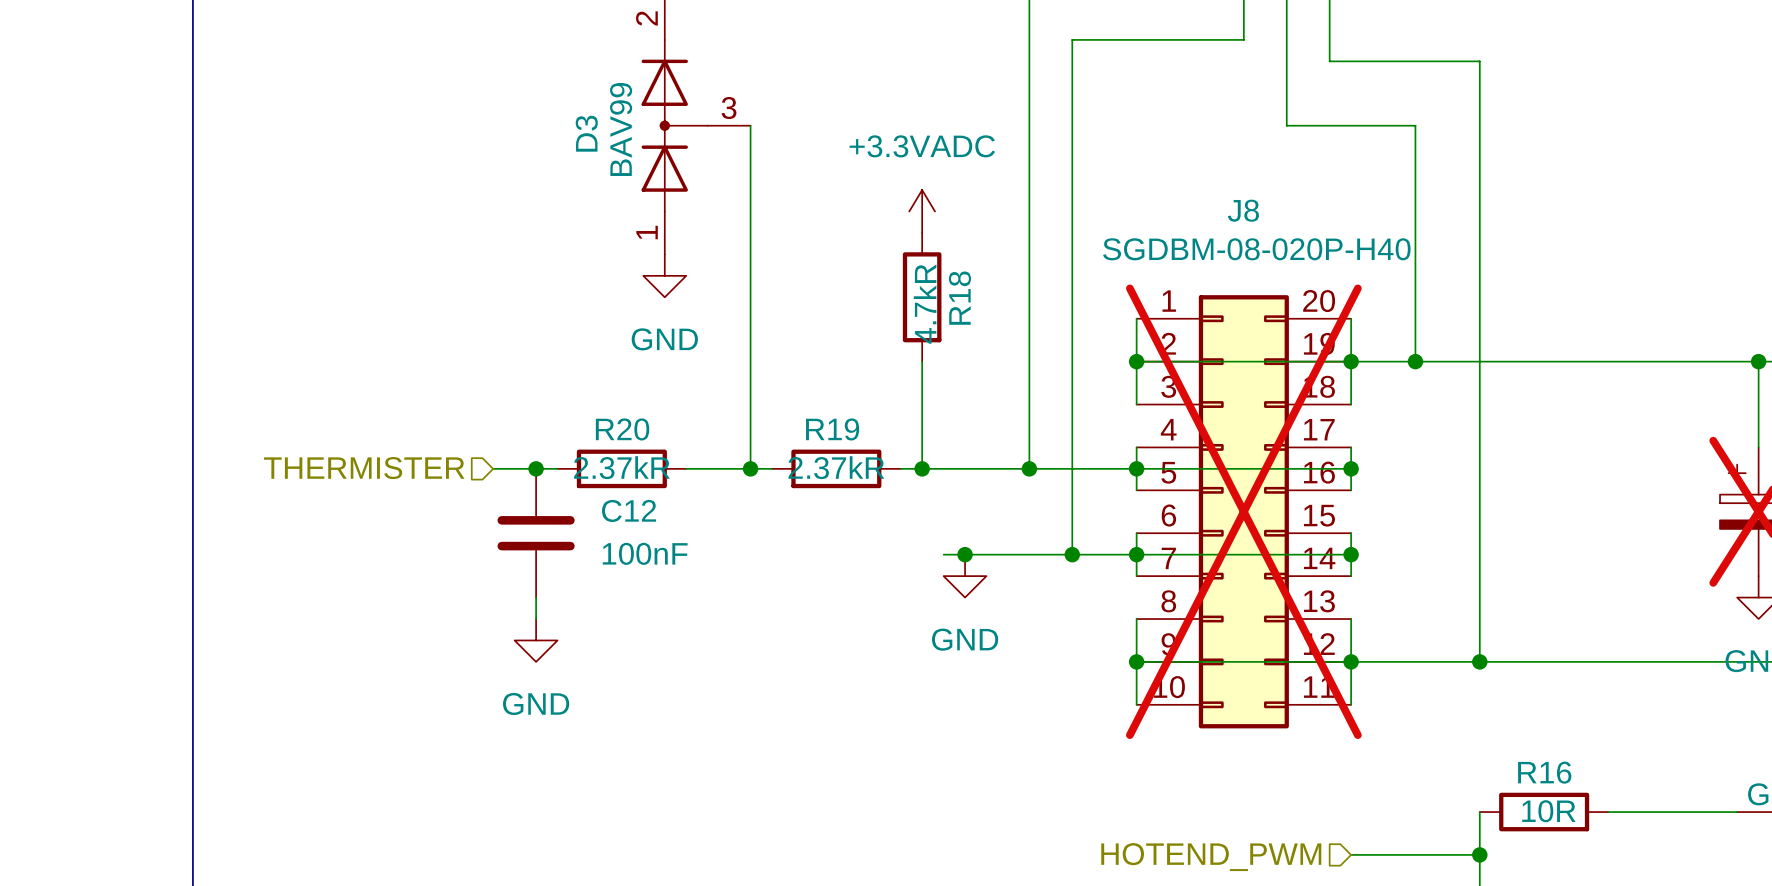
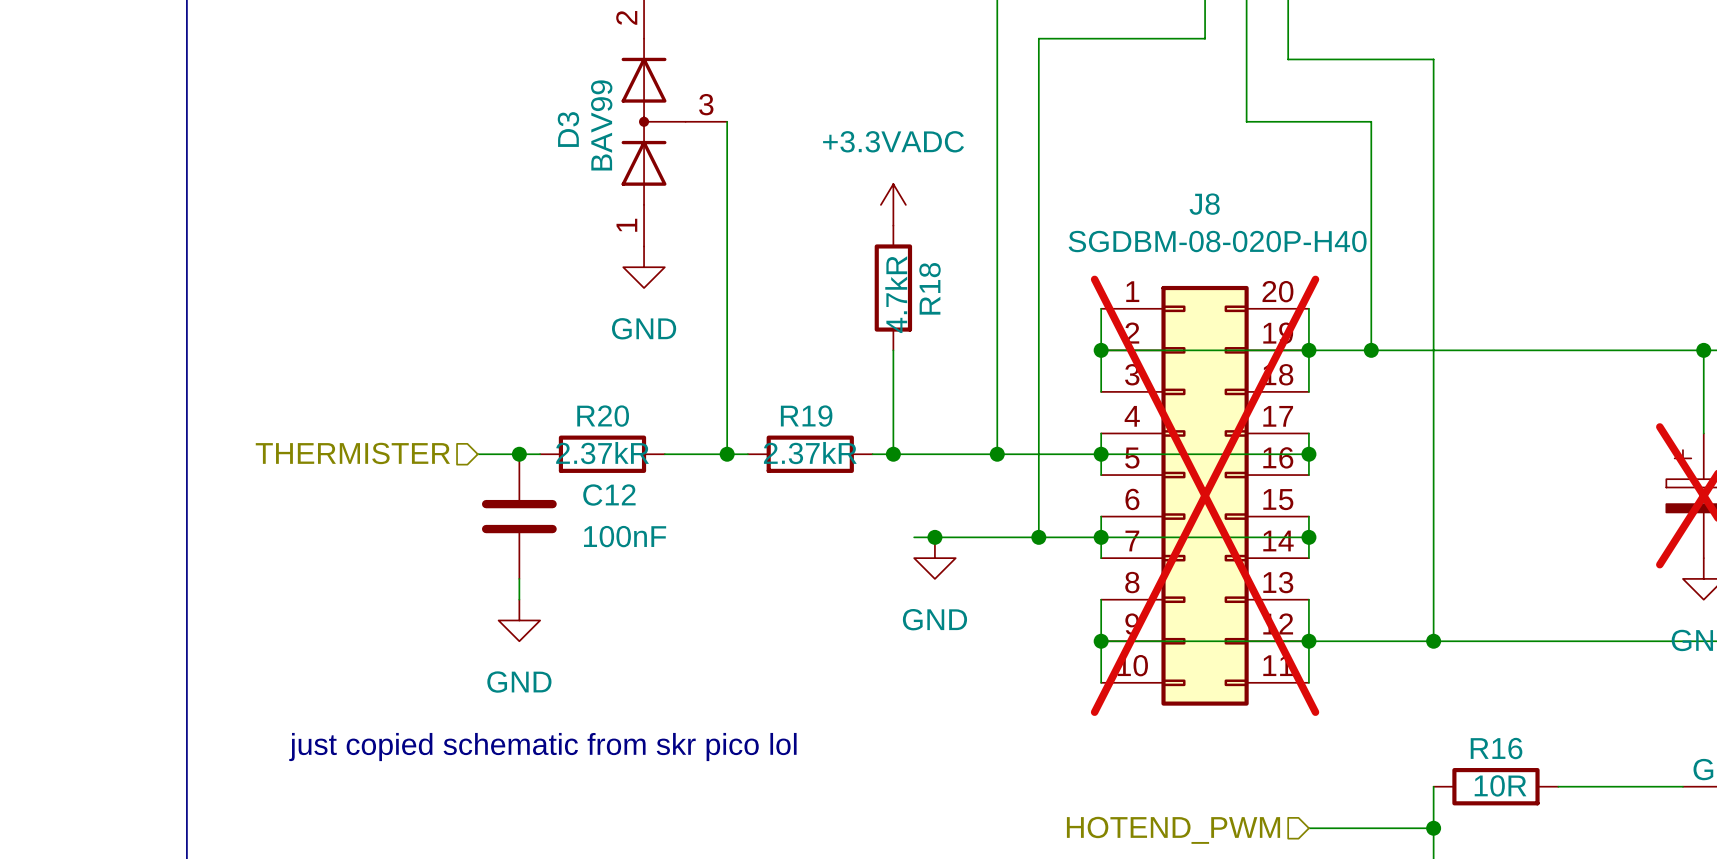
text: none -> just copied schematic from skr pico lol (542, 747)

